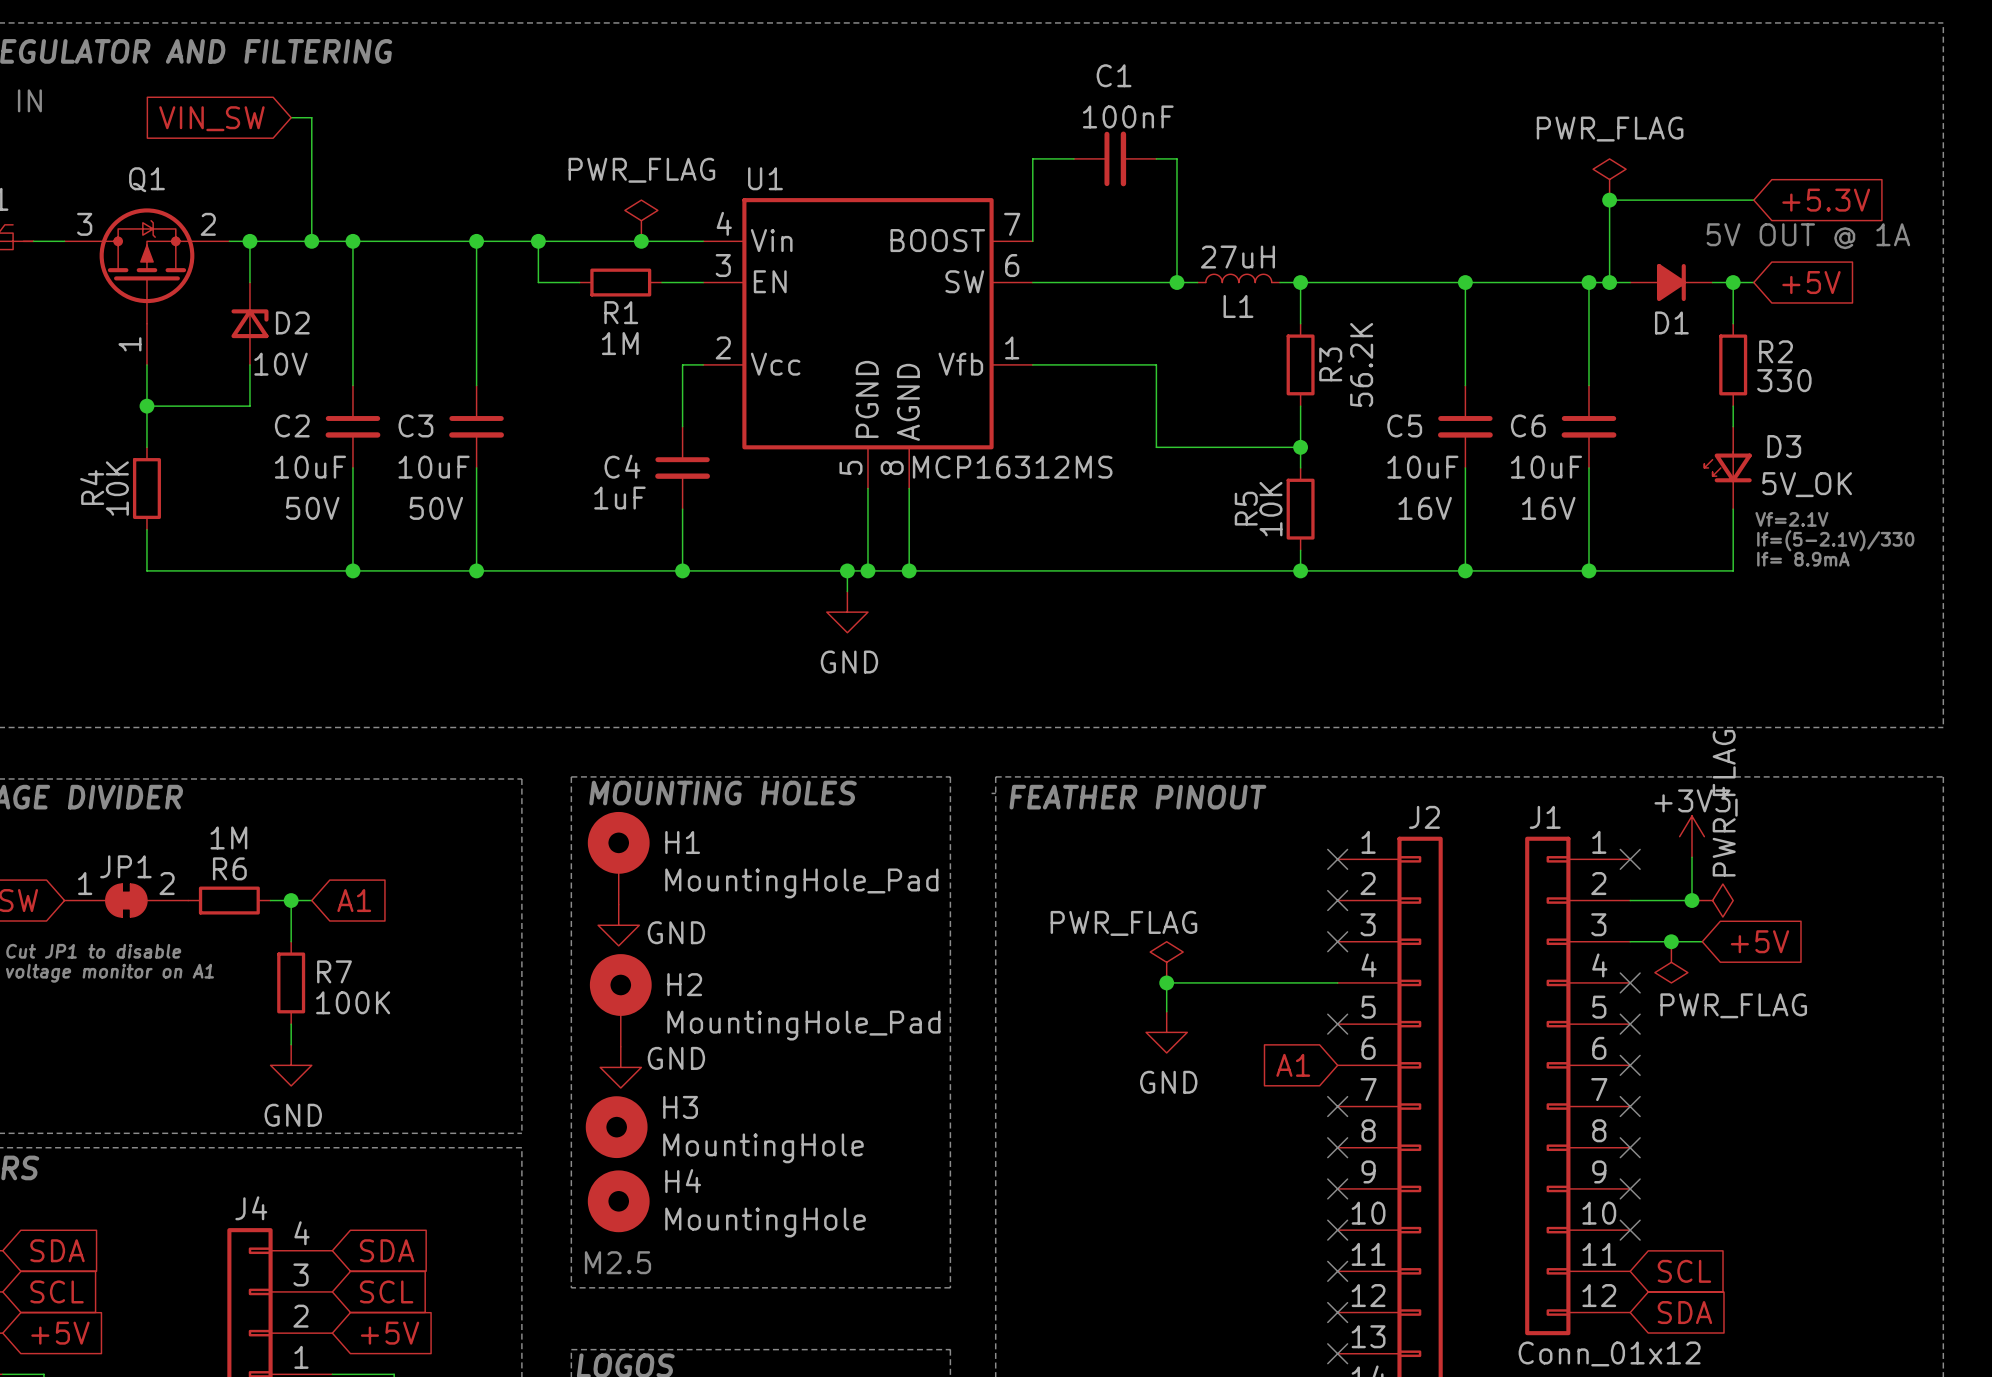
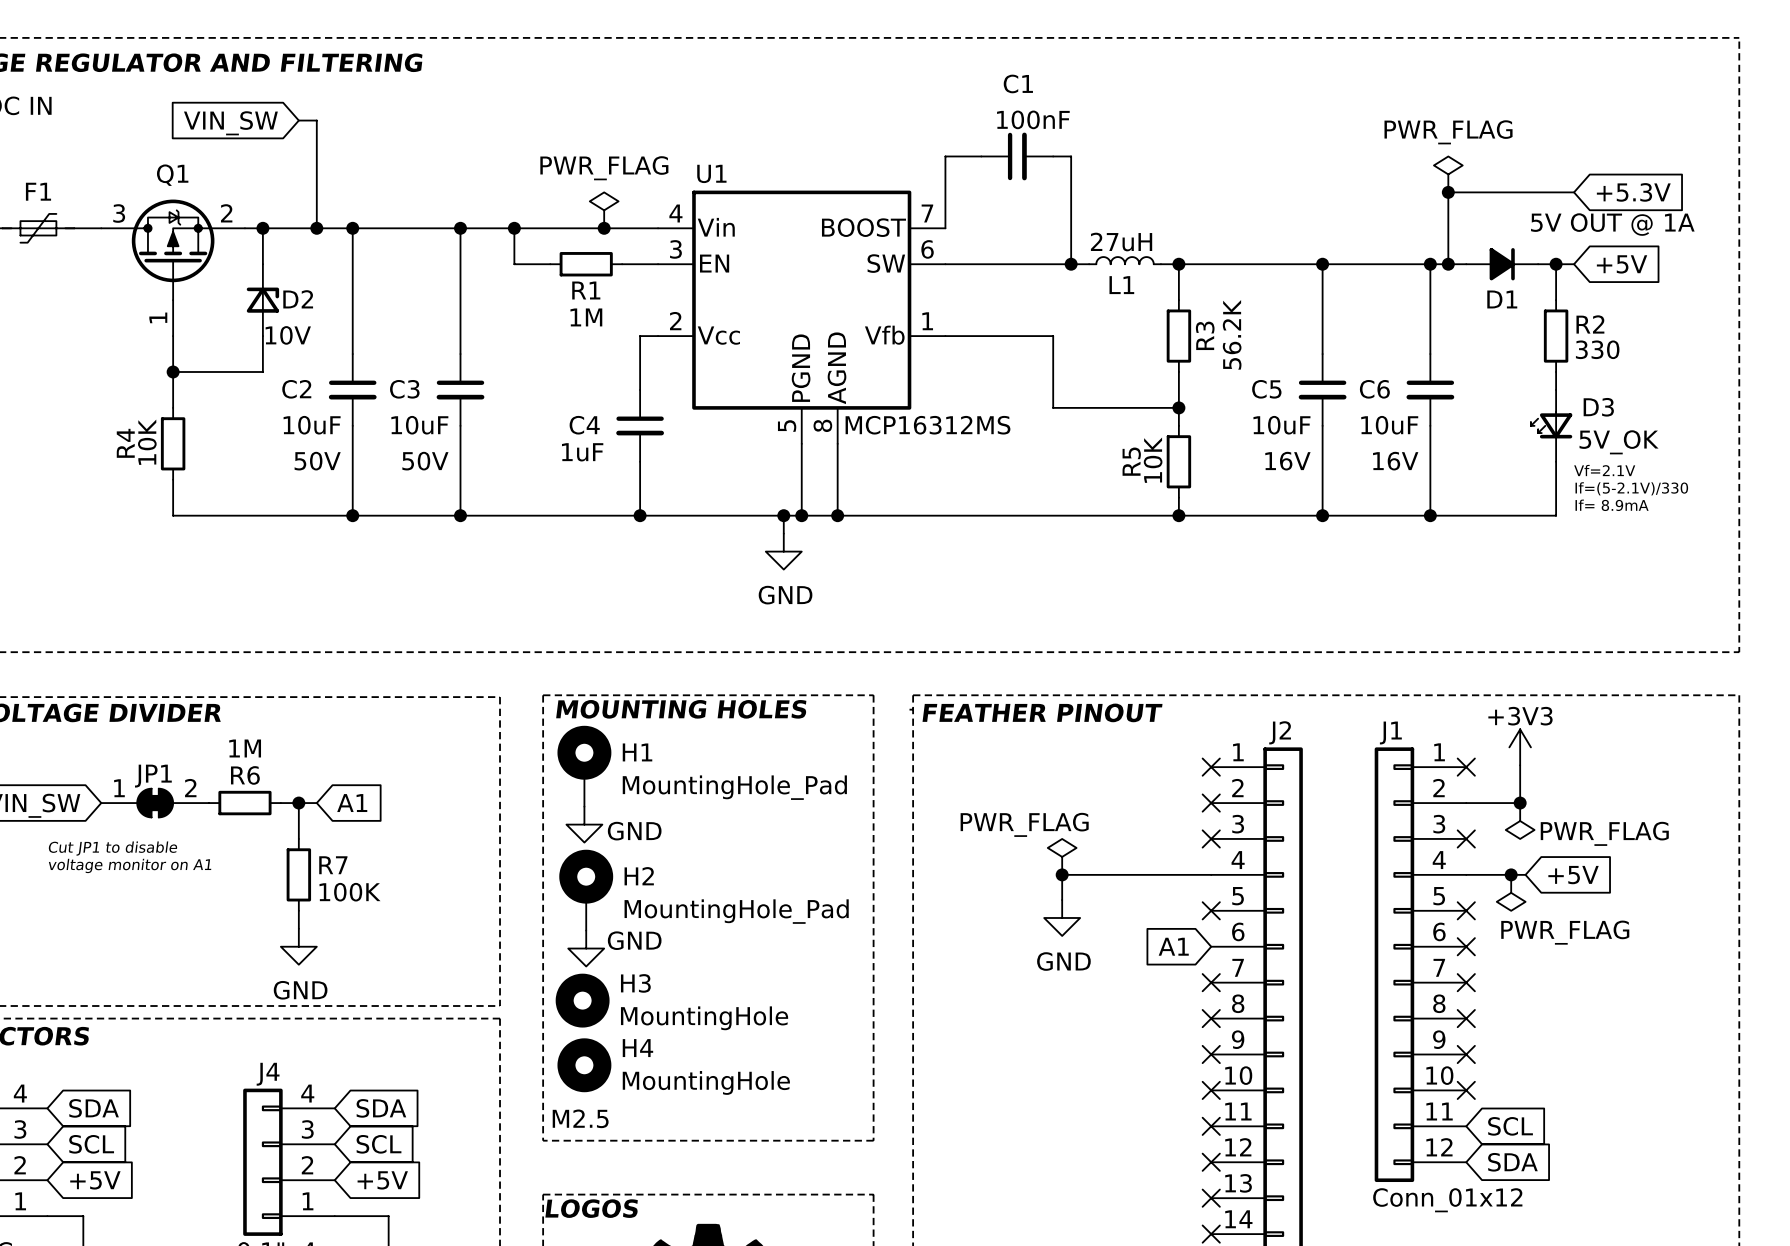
power symbol: PWR_FLAG (1712, 900) -> none
power symbol: none -> PWR_FLAG (1520, 821)
wire: (1630, 941) (1702, 941) -> none
junction position: (1671, 941) -> (1511, 874)
global label position: +5V (1759, 941) -> +5V (1573, 875)
power symbol: PWR_FLAG (1671, 962) -> none
wire: none -> (1466, 874) (1525, 874)
no-connect mark position: (1630, 982) -> (1466, 838)
power symbol: none -> PWR_FLAG (1511, 892)

